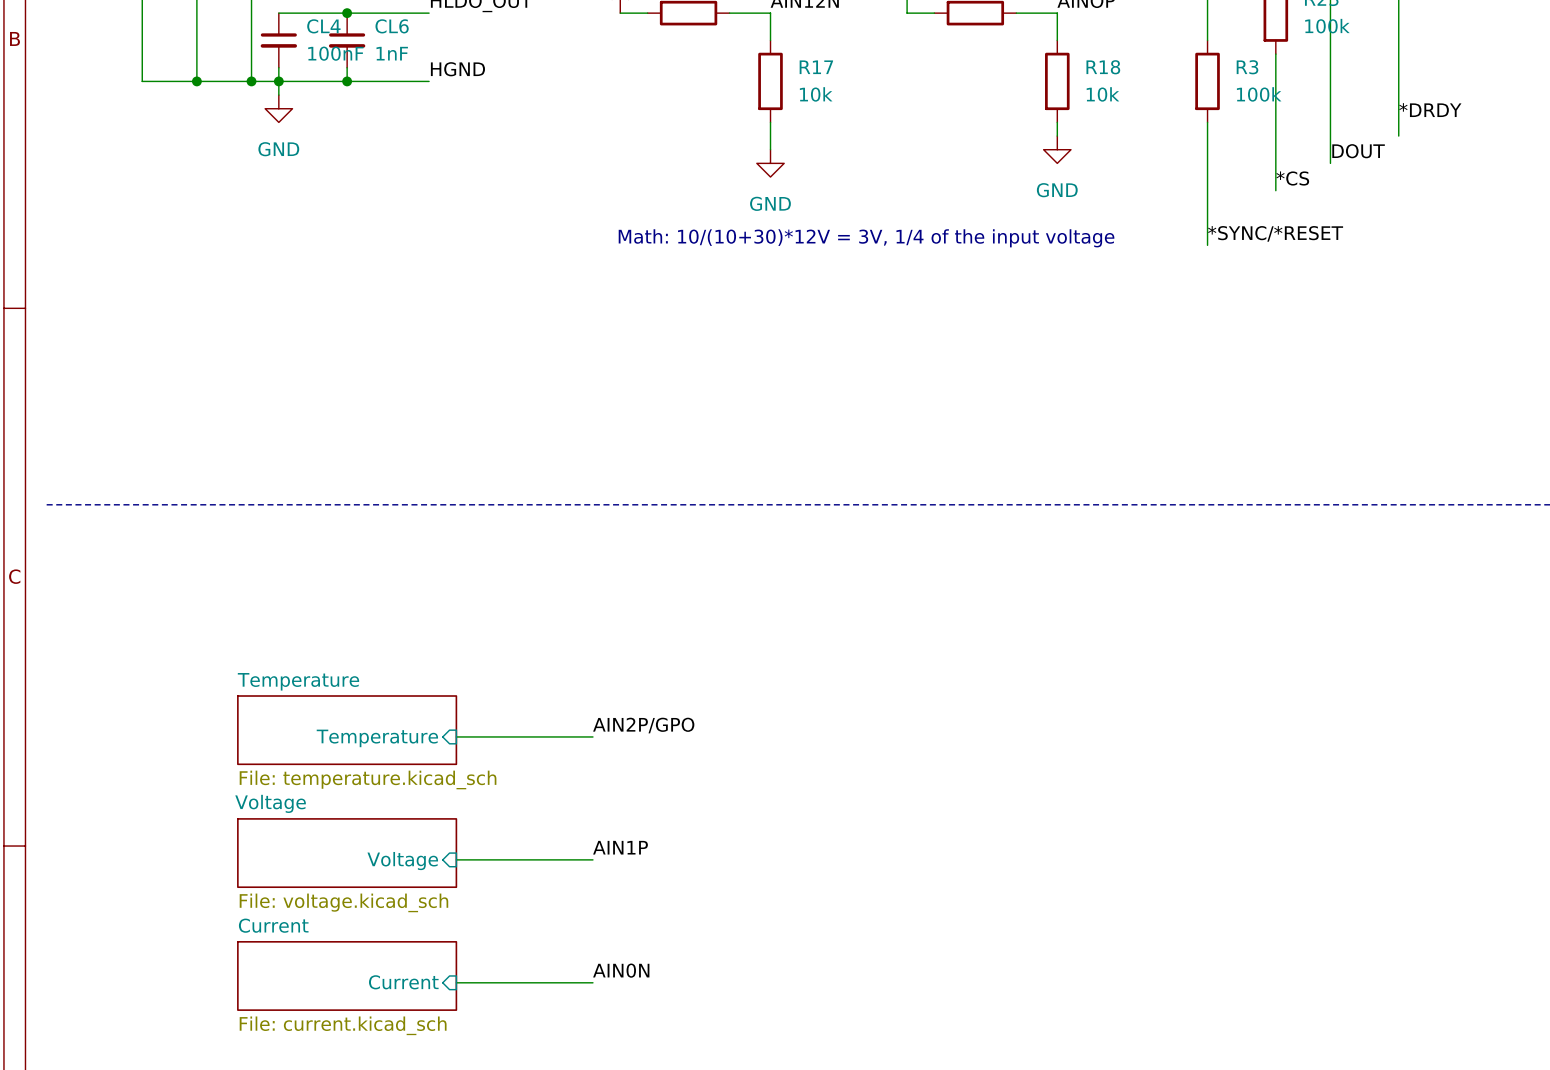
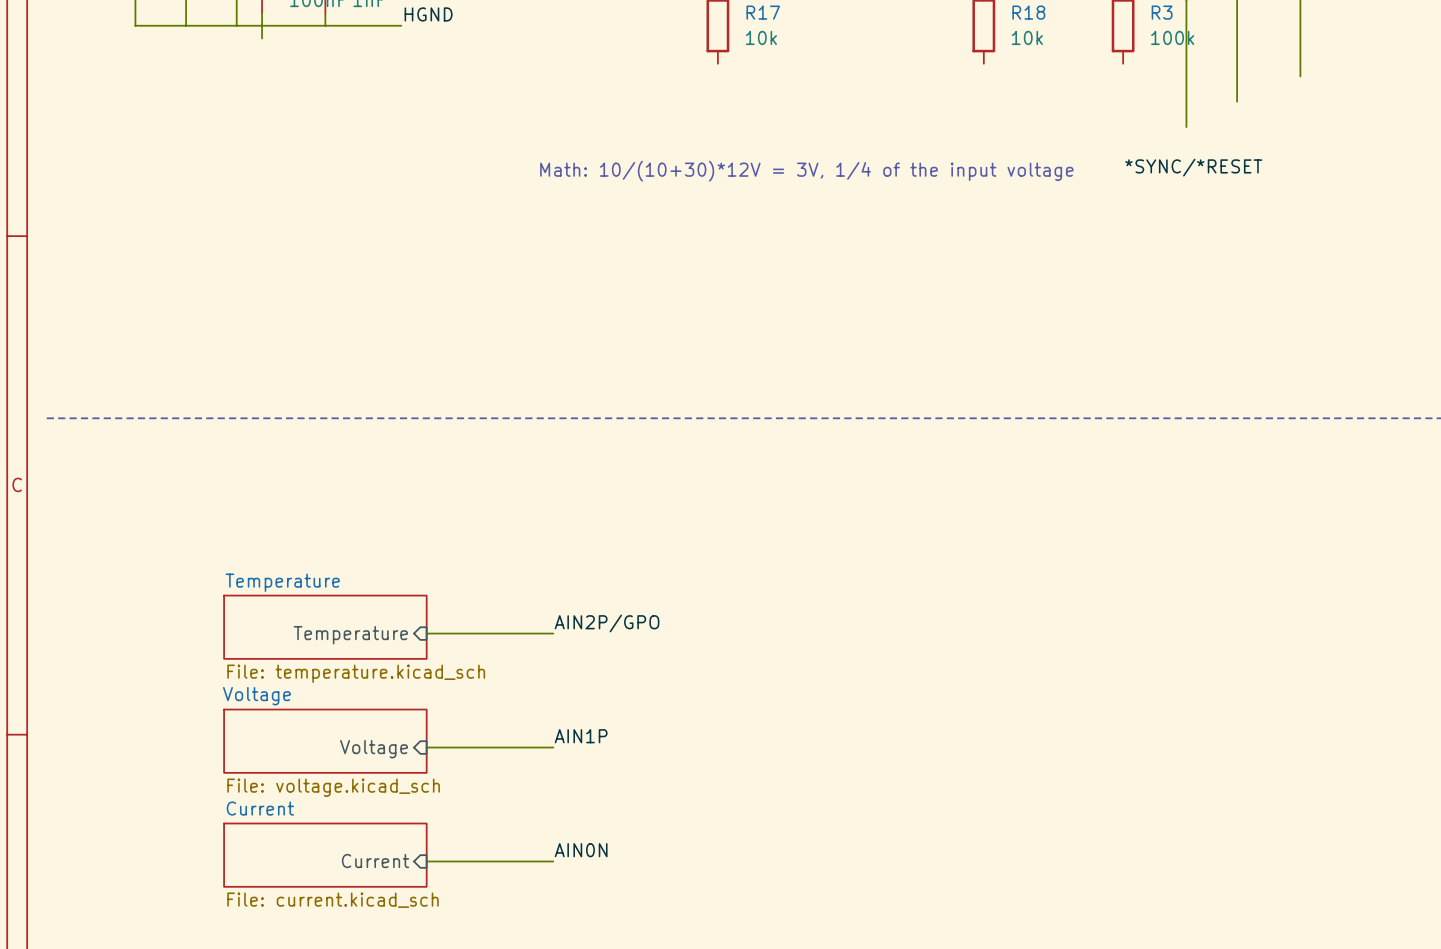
junction: (196, 81) -> none
junction: (251, 81) -> none
junction: (278, 81) -> none
junction: (347, 81) -> none
power symbol: GND (278, 108) -> none
label: *DRDY (1430, 110) -> none
wire: (770, 122) (770, 149) -> none
wire: (1057, 122) (1057, 136) -> none
wire: (1207, 122) (1207, 245) -> none
power symbol: GND (1057, 149) -> none
label: DOUT (1358, 151) -> none
power symbol: GND (770, 163) -> none
label: *CS (1292, 178) -> none

